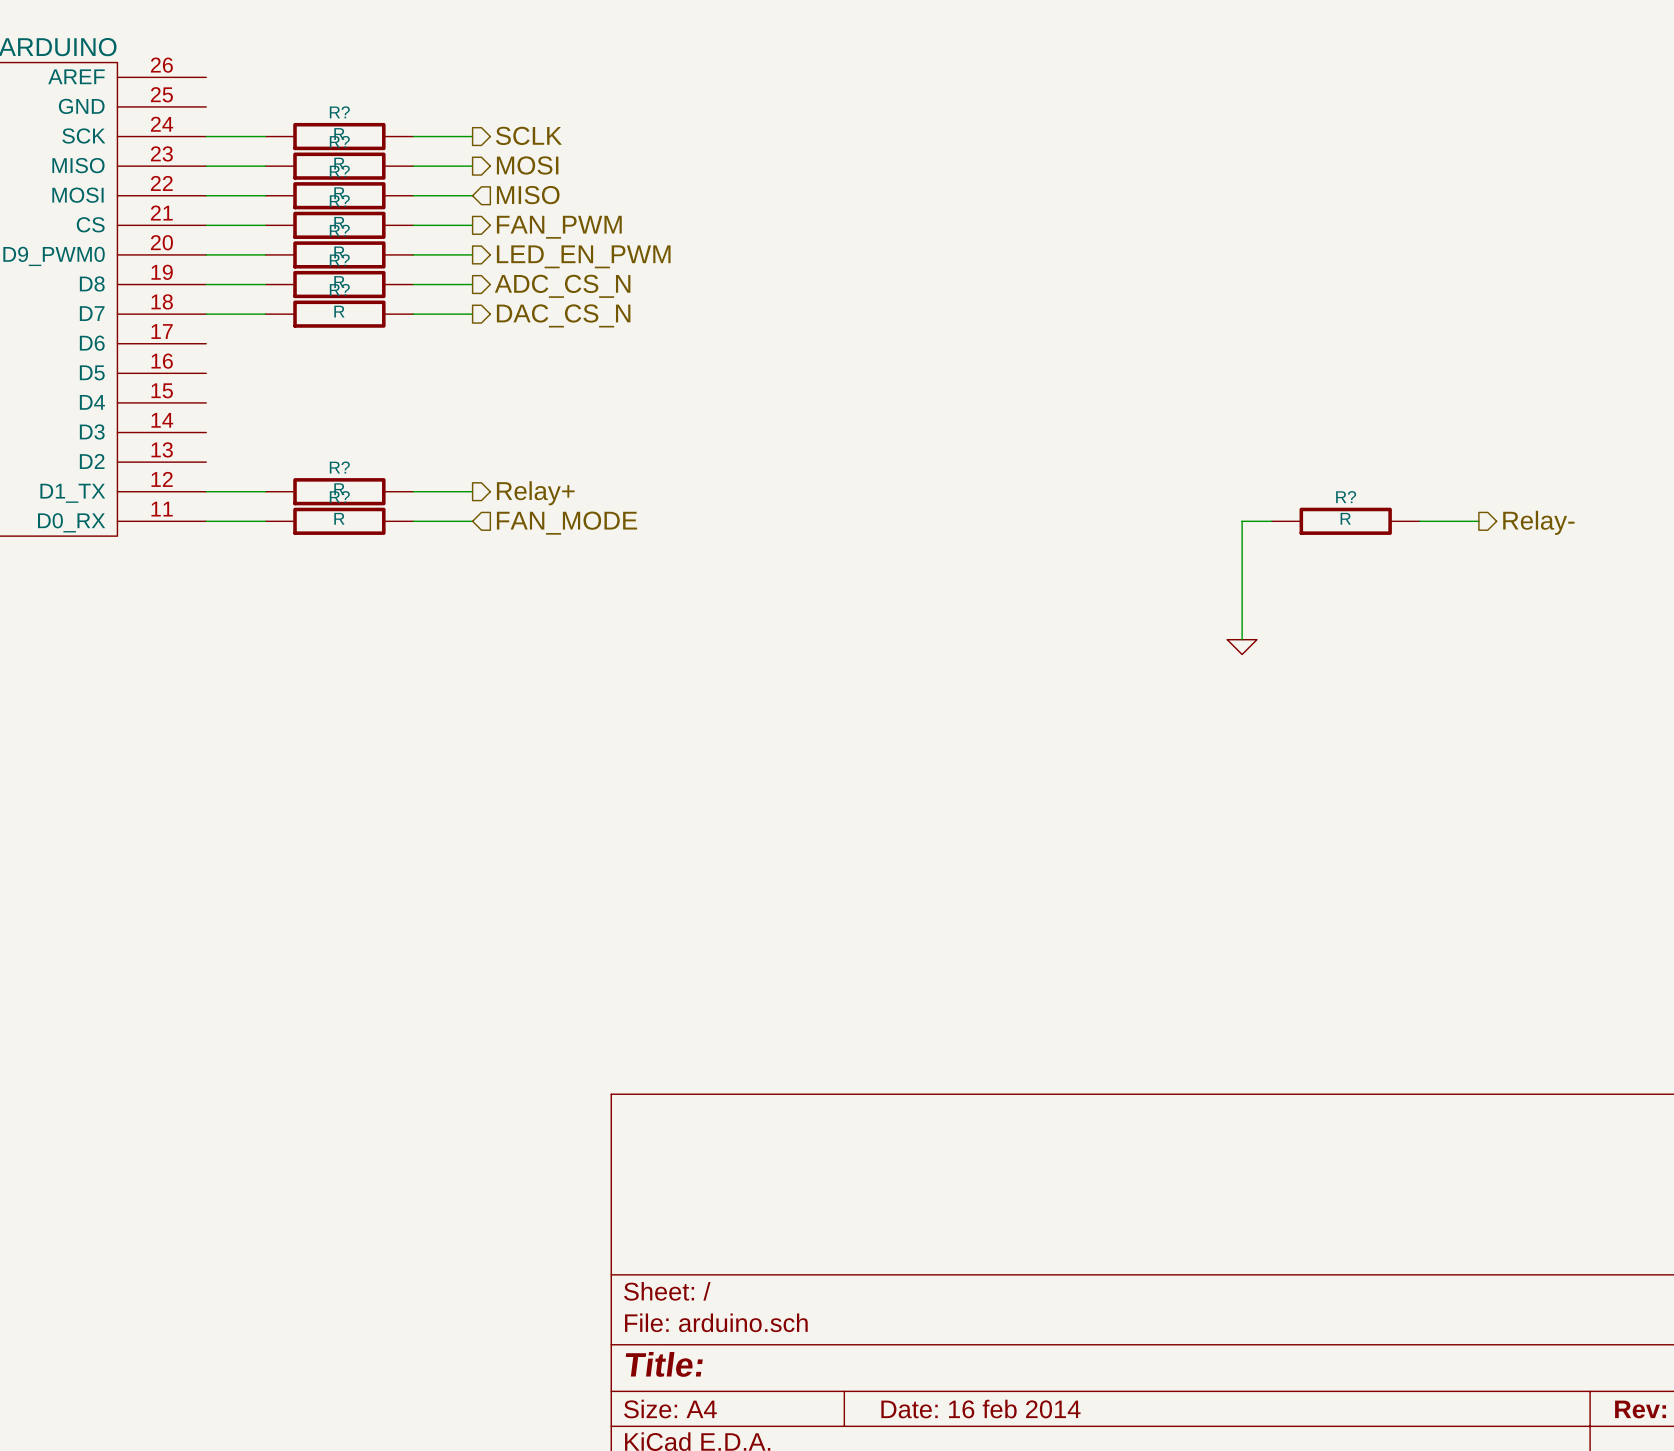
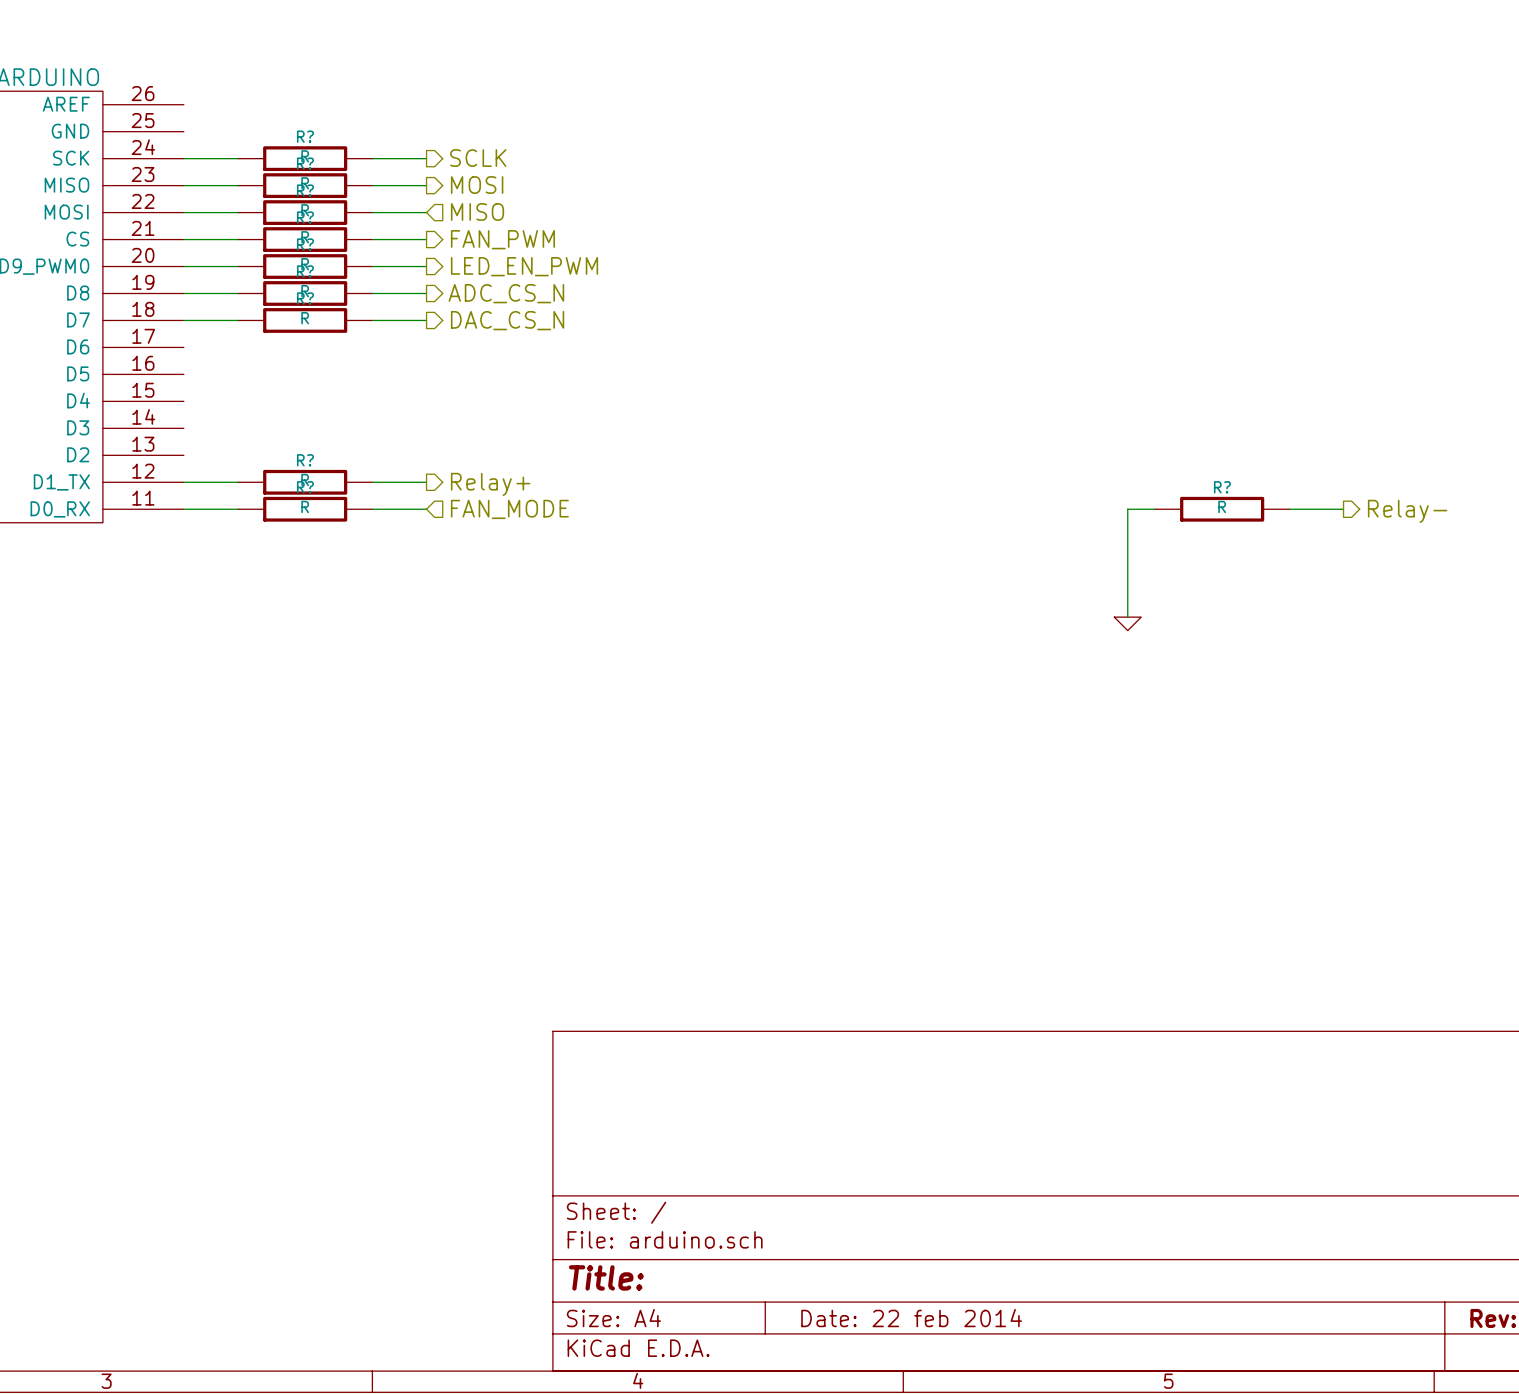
title block: Date: 16 feb 2014 (980, 1409) -> Date: 22 feb 2014 (911, 1318)

